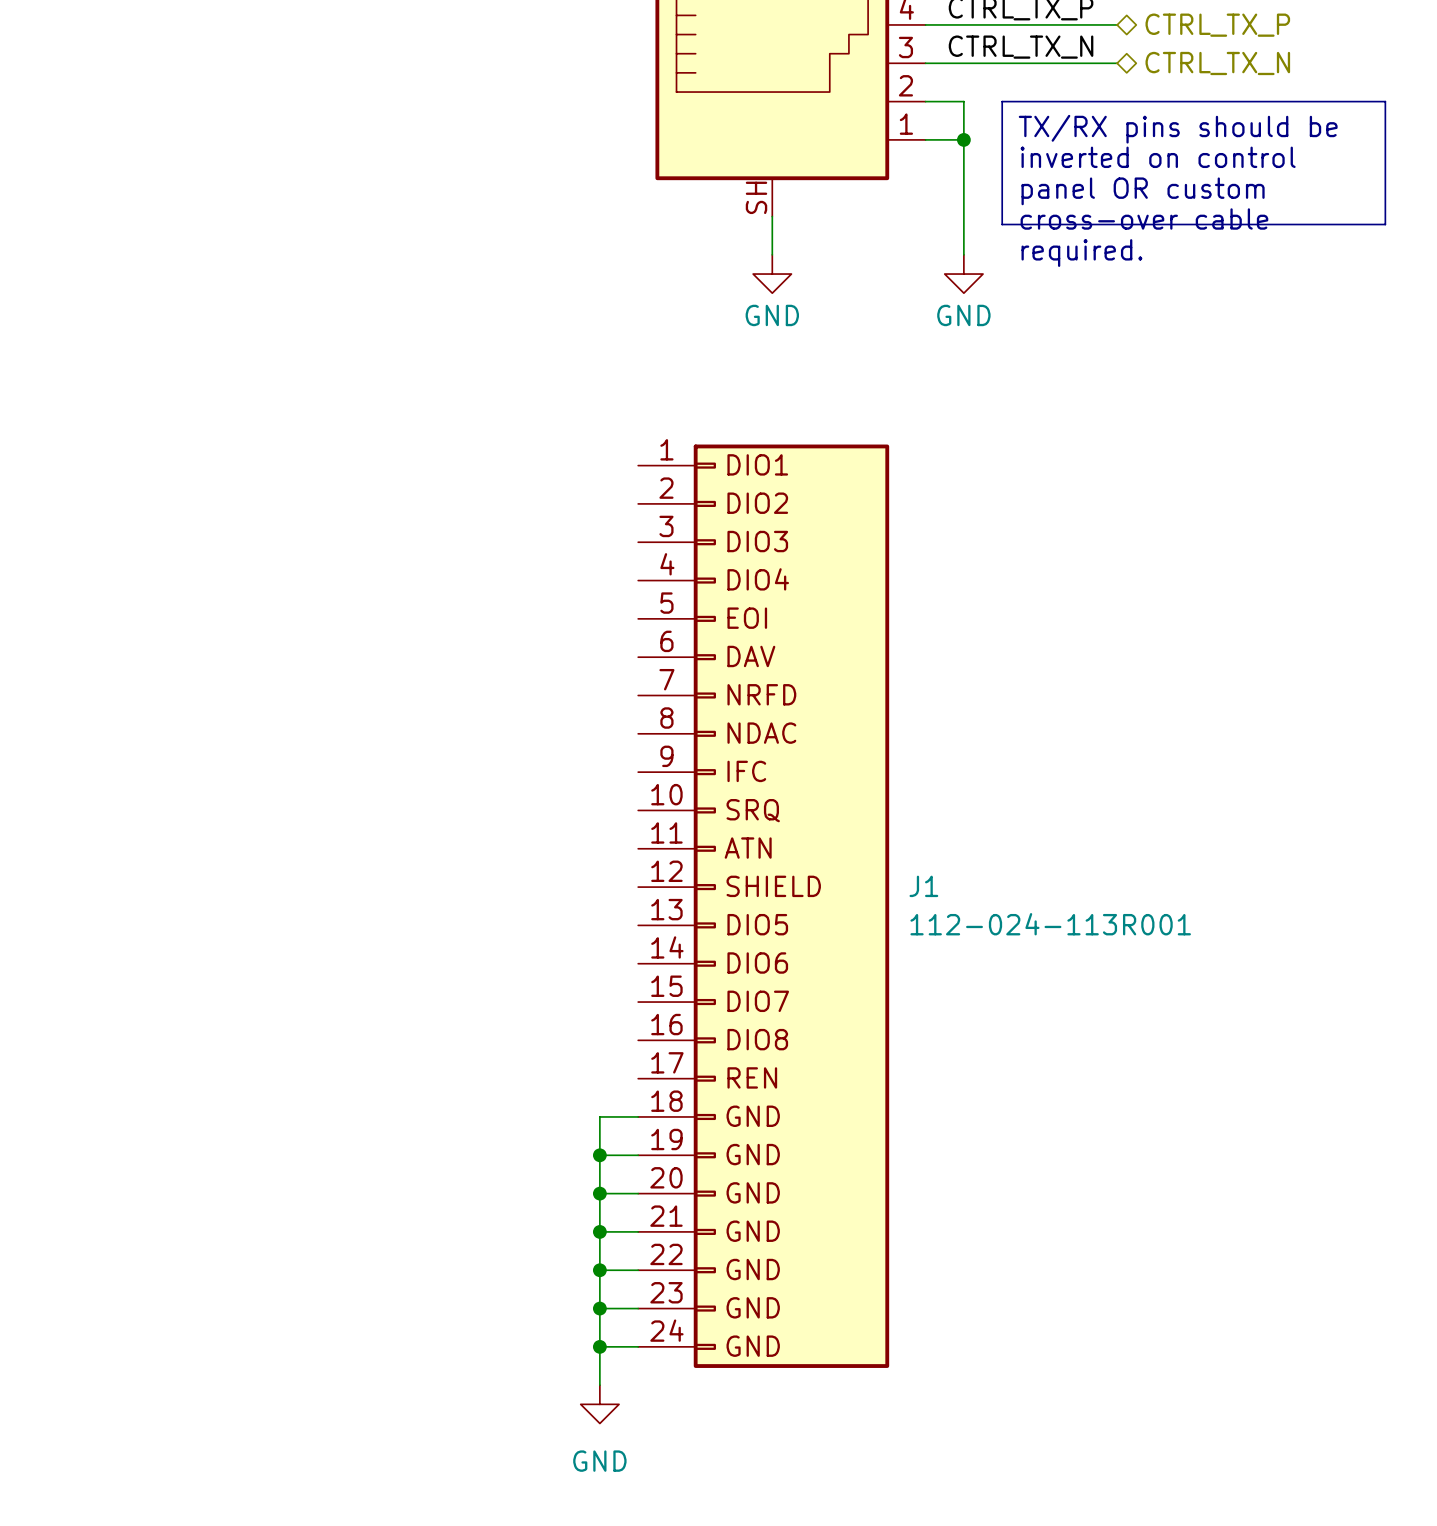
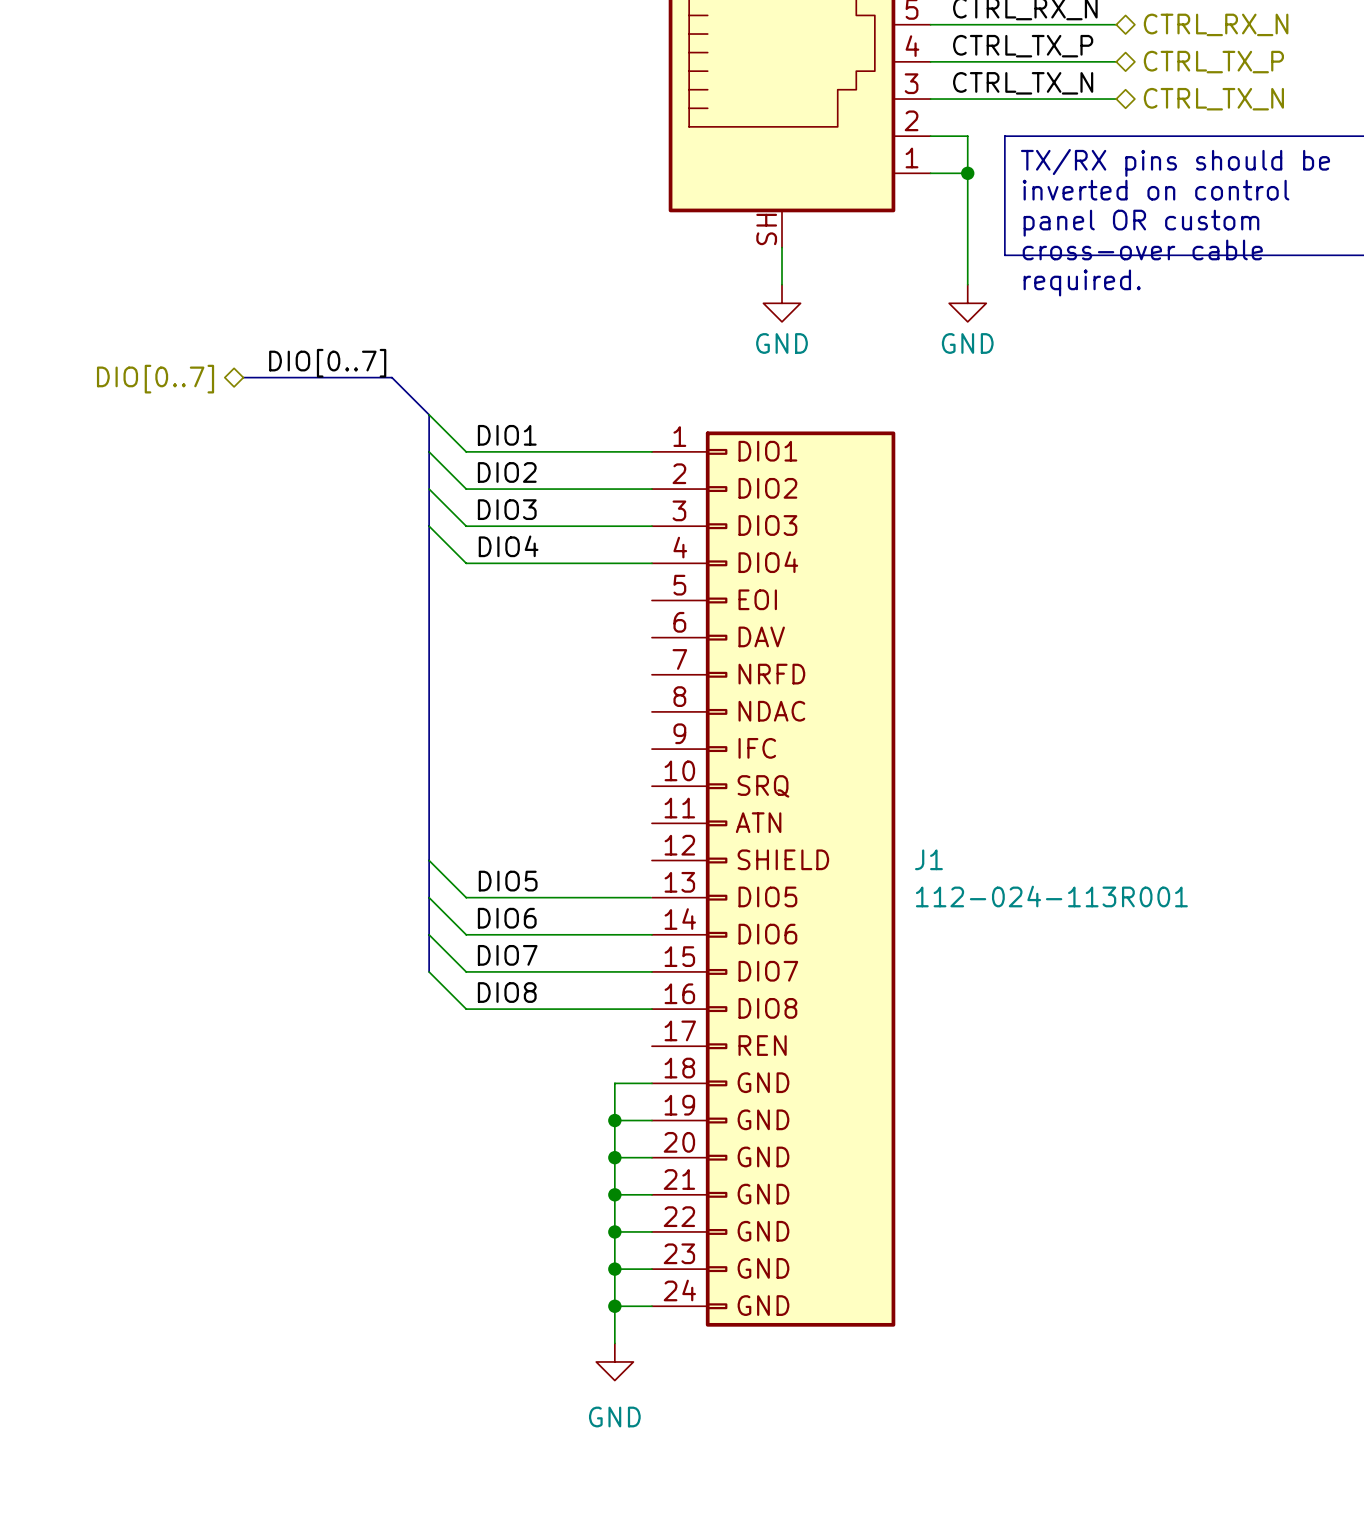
label: none -> DIO[0..7] (327, 363)
bus: none -> (243, 377) (391, 377) (429, 414) (429, 971)
hierarchical label: none -> DIO[0..7] (155, 379)
wire: none -> (429, 414) (466, 451) (651, 451)
label: none -> DIO1 (507, 435)
wire: none -> (429, 451) (466, 489) (651, 489)
label: none -> DIO2 (507, 472)
wire: none -> (429, 489) (466, 526) (651, 526)
label: none -> DIO3 (507, 509)
wire: none -> (429, 526) (466, 563) (651, 563)
label: none -> DIO4 (508, 546)
wire: none -> (429, 860) (466, 897) (651, 897)
label: none -> DIO5 (508, 881)
wire: none -> (429, 897) (466, 934) (651, 934)
J1 position: (763, 906) -> (773, 879)
label: none -> DIO6 (507, 918)
wire: none -> (429, 934) (466, 971) (651, 971)
label: none -> DIO7 (507, 955)
wire: none -> (429, 971) (466, 1009) (651, 1009)
label: none -> DIO8 (507, 992)
junction: none -> (614, 1120)
junction: (599, 1346) -> none
wire: (638, 1346) (599, 1346) (599, 1385) -> (651, 1083) (614, 1083) (614, 1120)
power symbol position: GND (599, 1404) -> GND (614, 1361)

